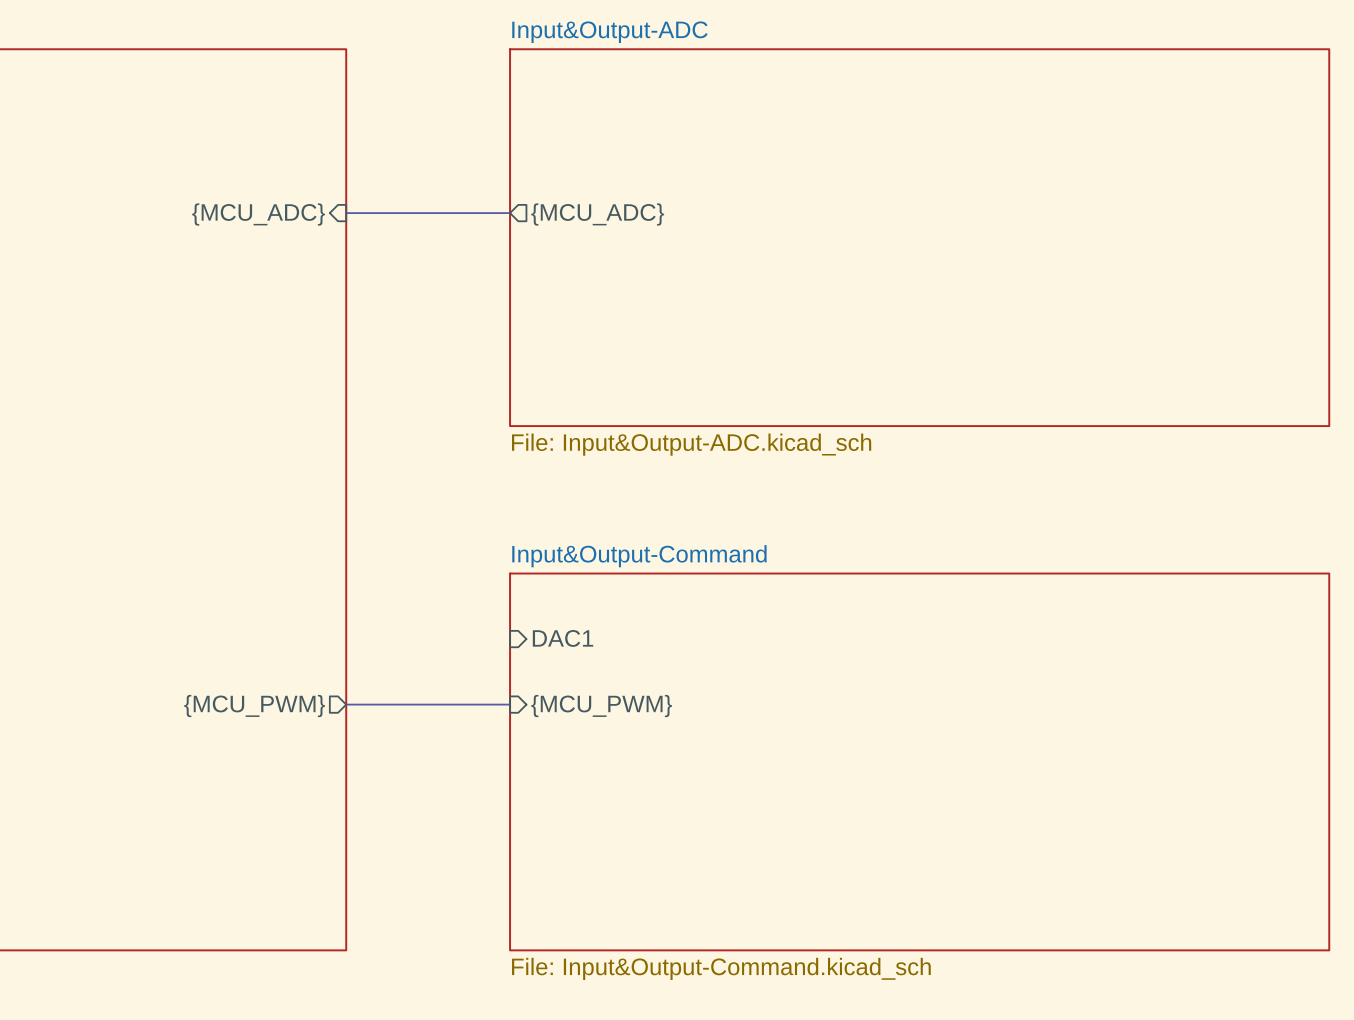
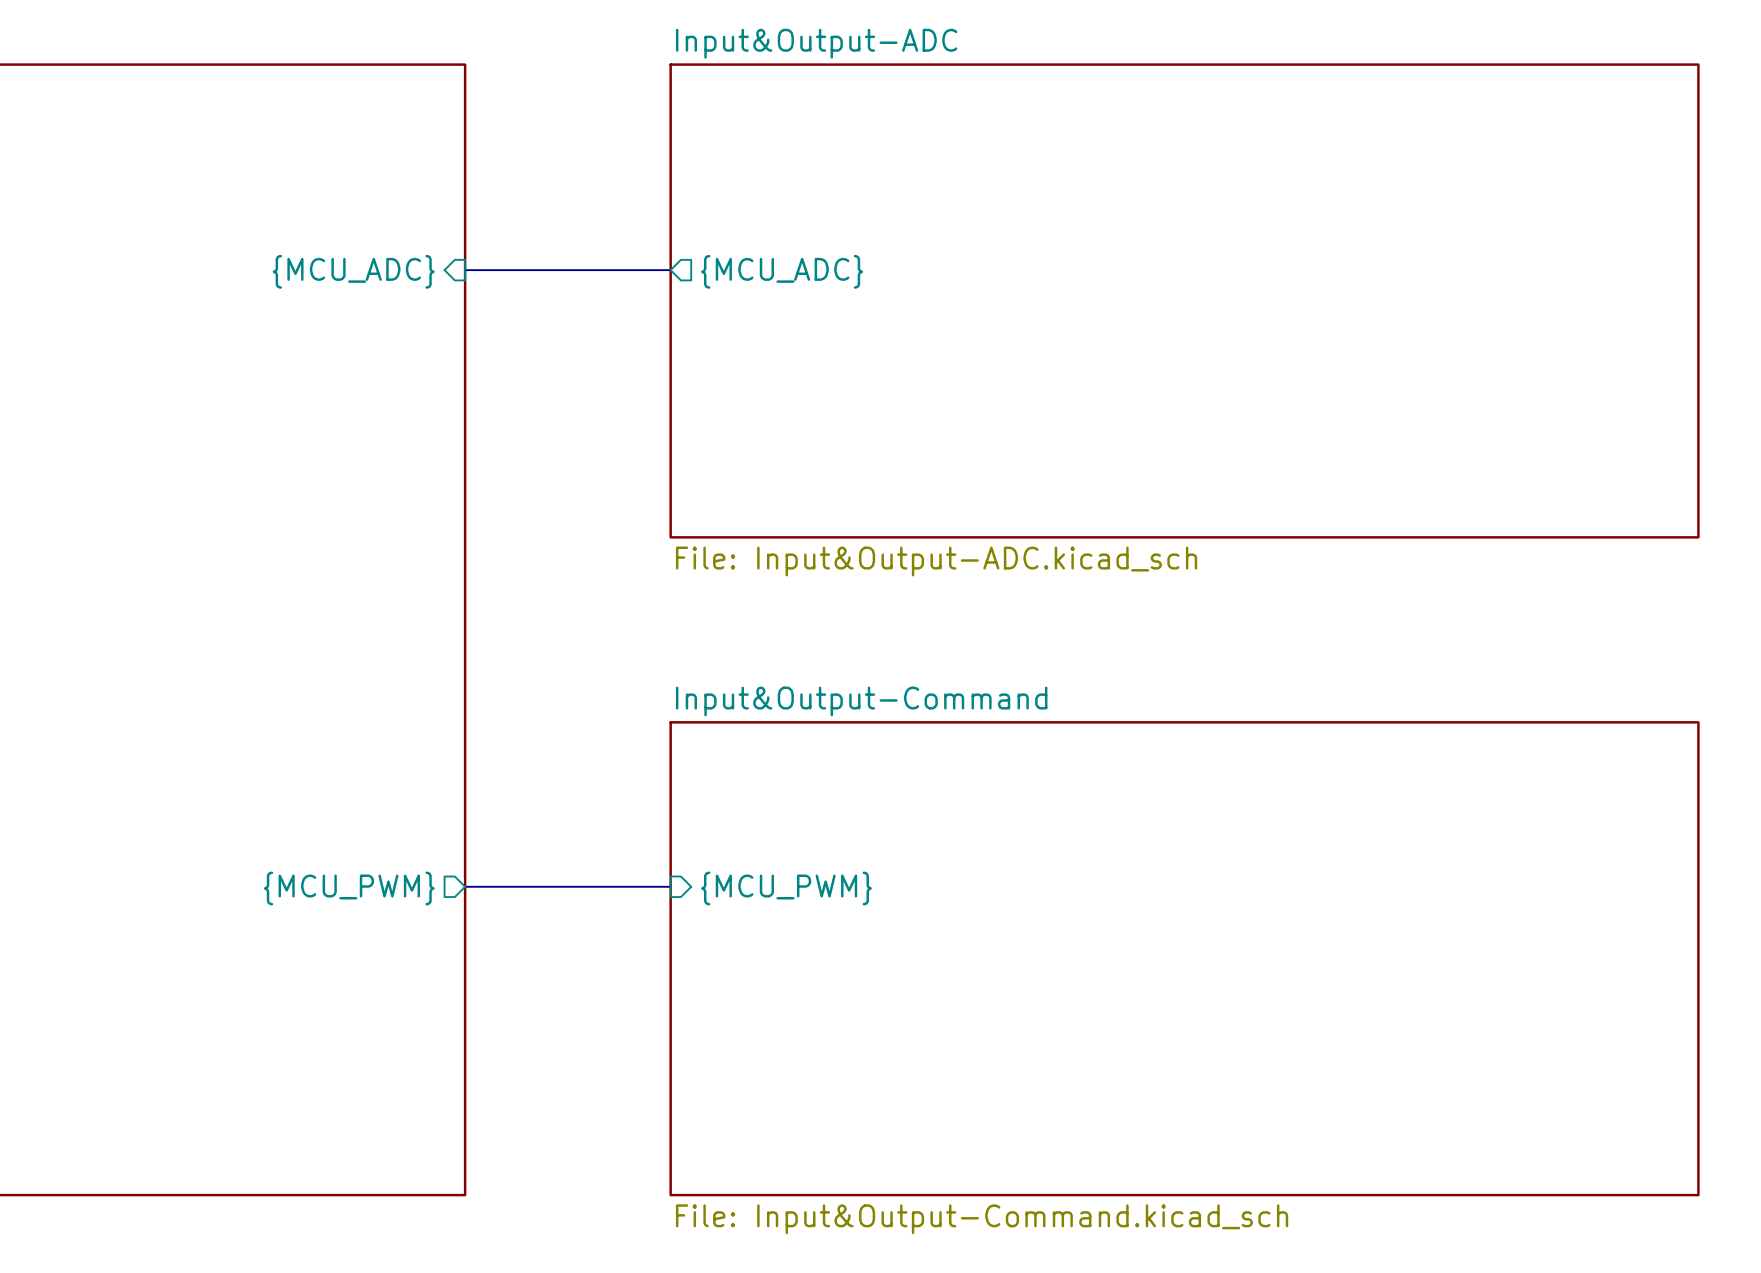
sheet pin: DAC1 (563, 638) -> none

